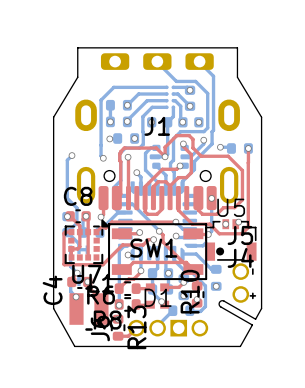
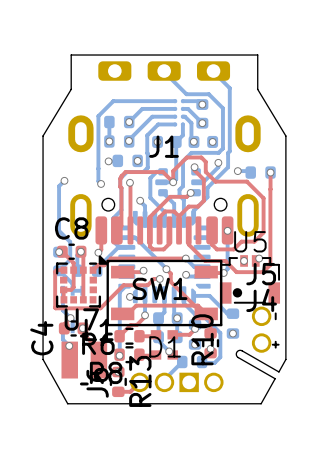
bottom track: (205, 242) (202, 245) (190, 245) -> none

